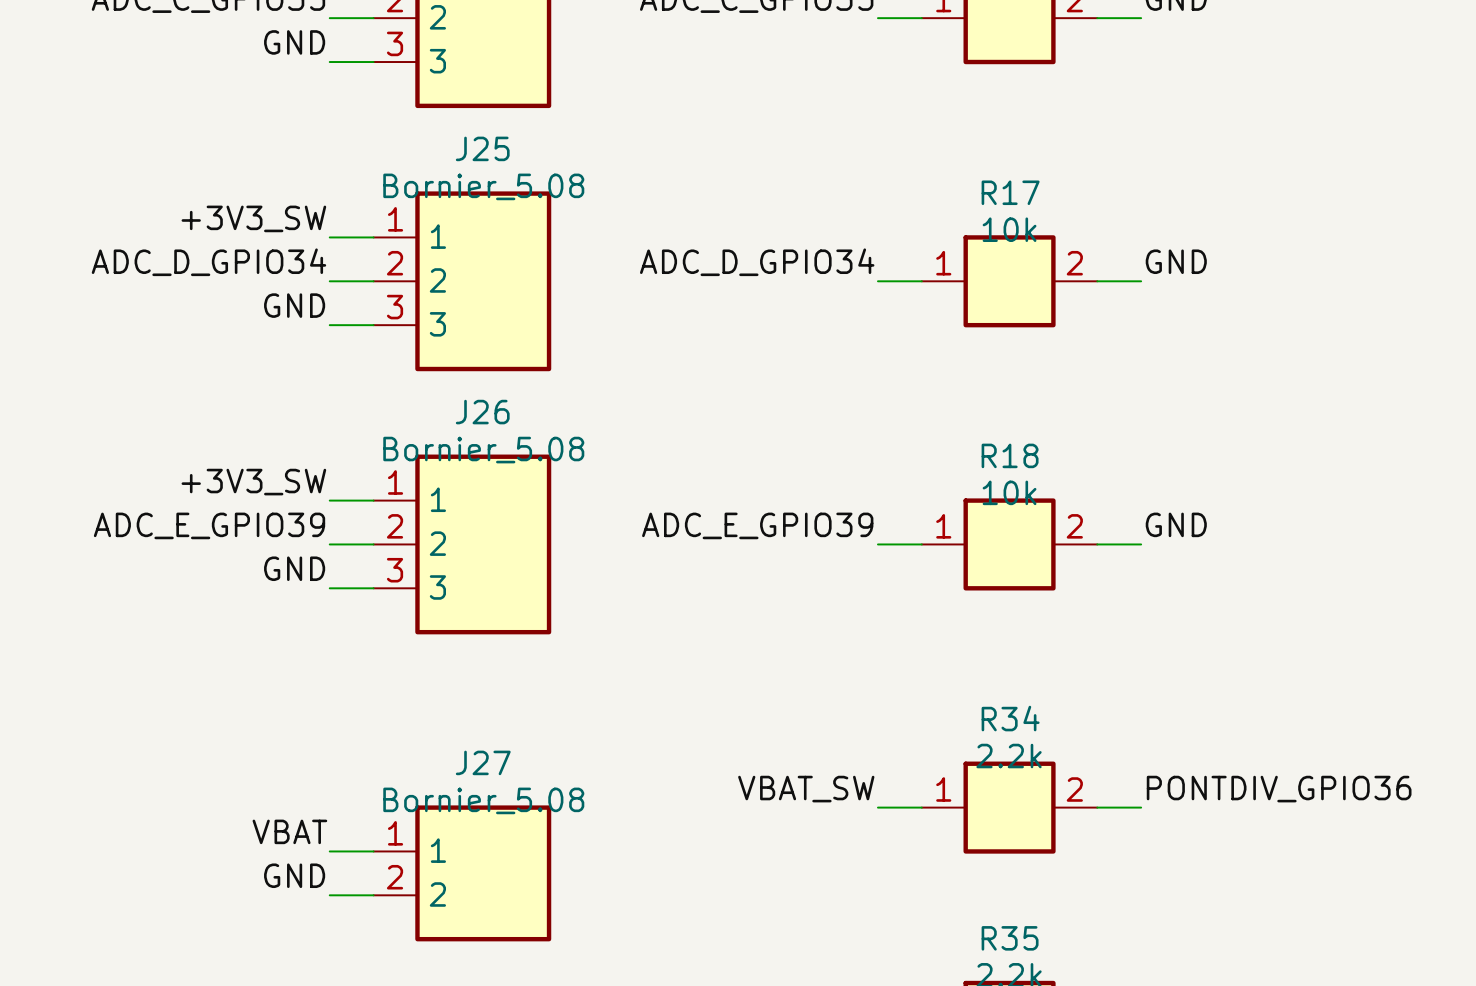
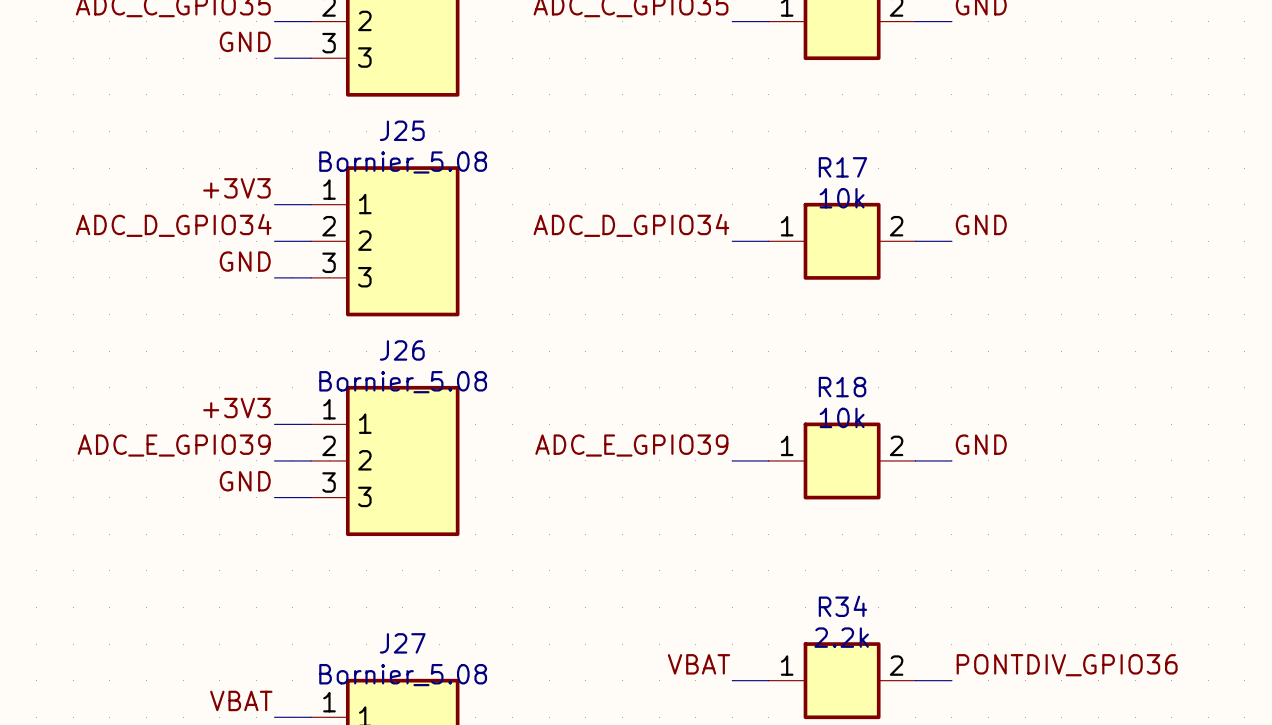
label: +3V3_SW (253, 218) -> +3V3 (236, 188)
label: +3V3_SW (253, 482) -> +3V3 (236, 408)
label: VBAT_SW (806, 789) -> VBAT (698, 664)

